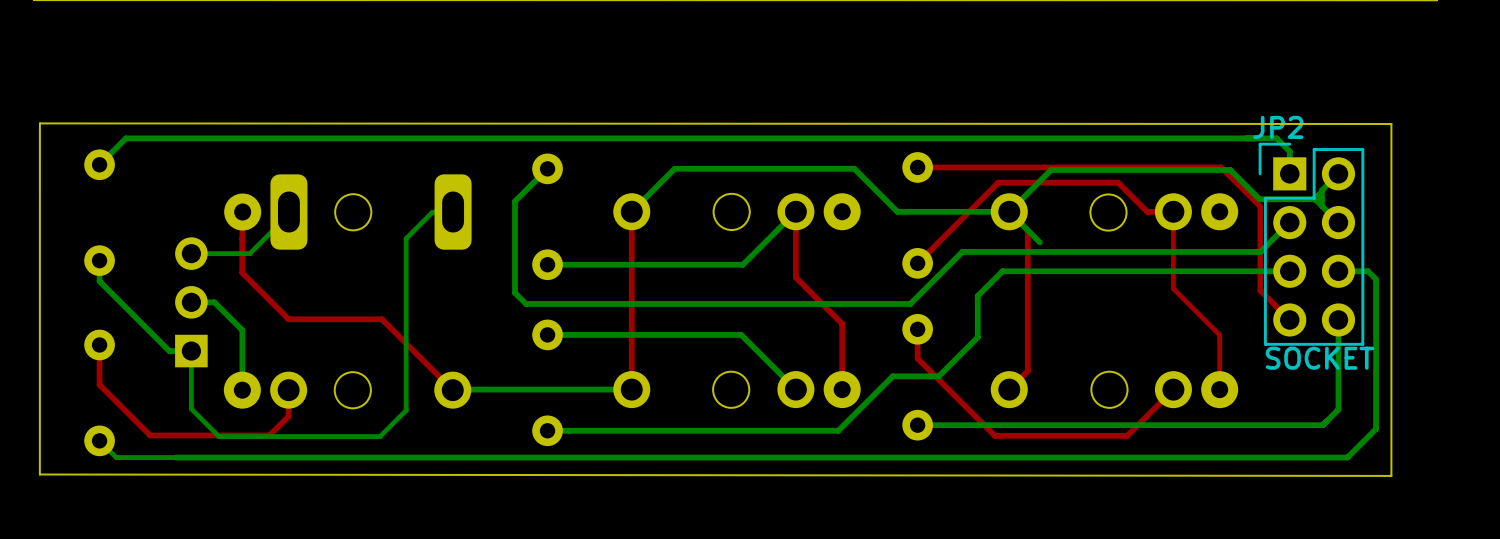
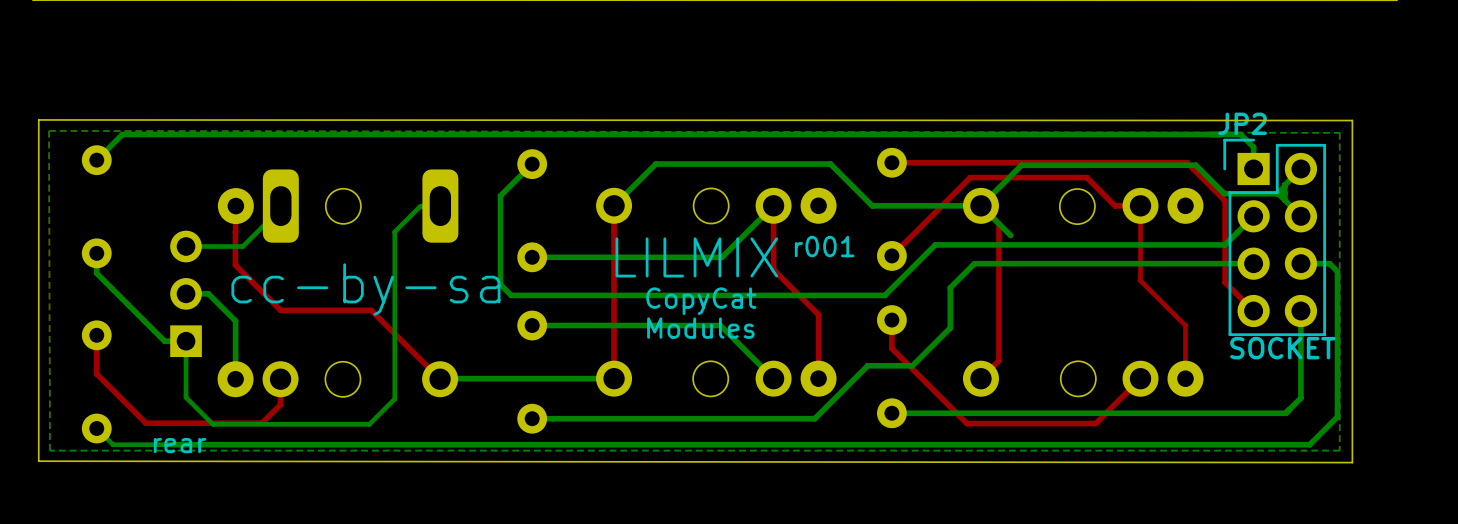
bottom zone outline: none -> (49, 130) (49, 450) (1339, 450) (1339, 132) (49, 130)
text: none -> r001 (824, 246)
text: none -> LILMIX (696, 257)
text: none -> cc-by-sa (365, 289)
text: none -> CopyCat (701, 301)
text: none -> Modules (700, 328)
text: none -> rear (180, 445)

